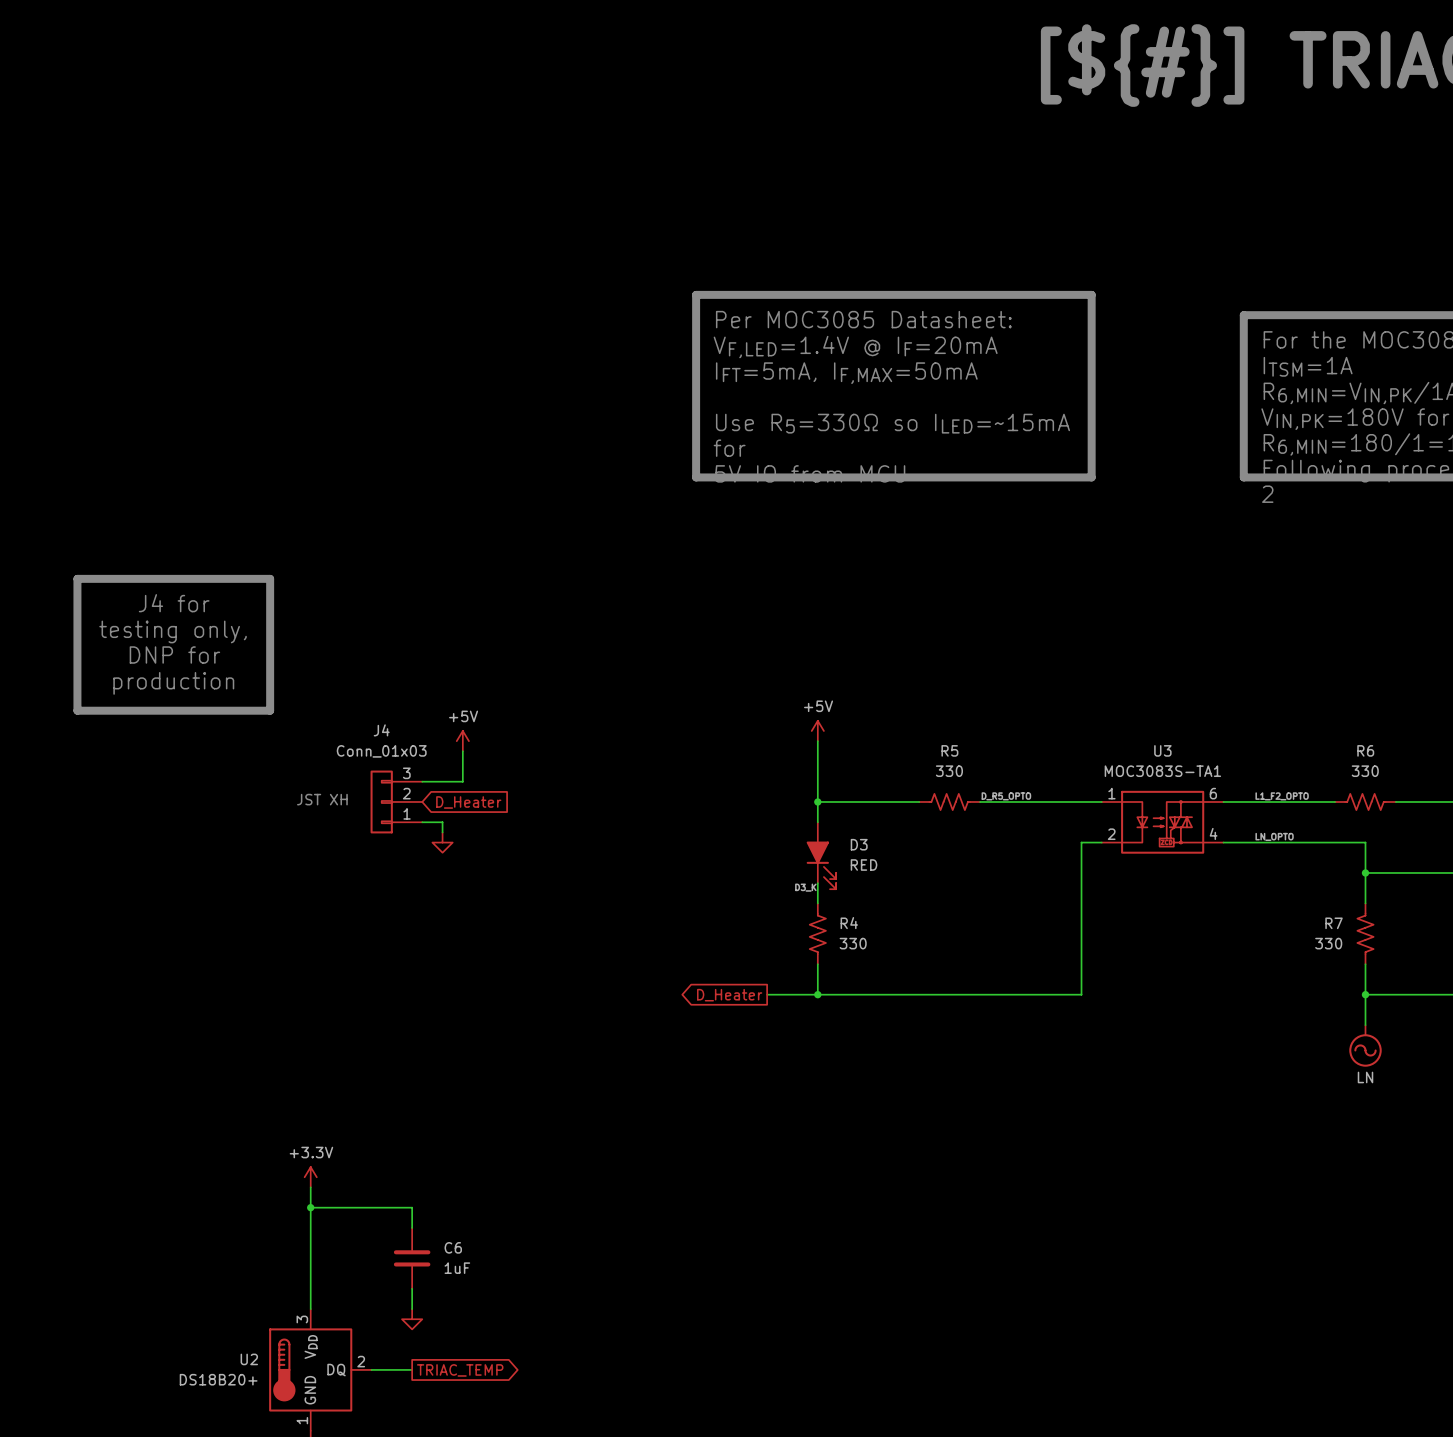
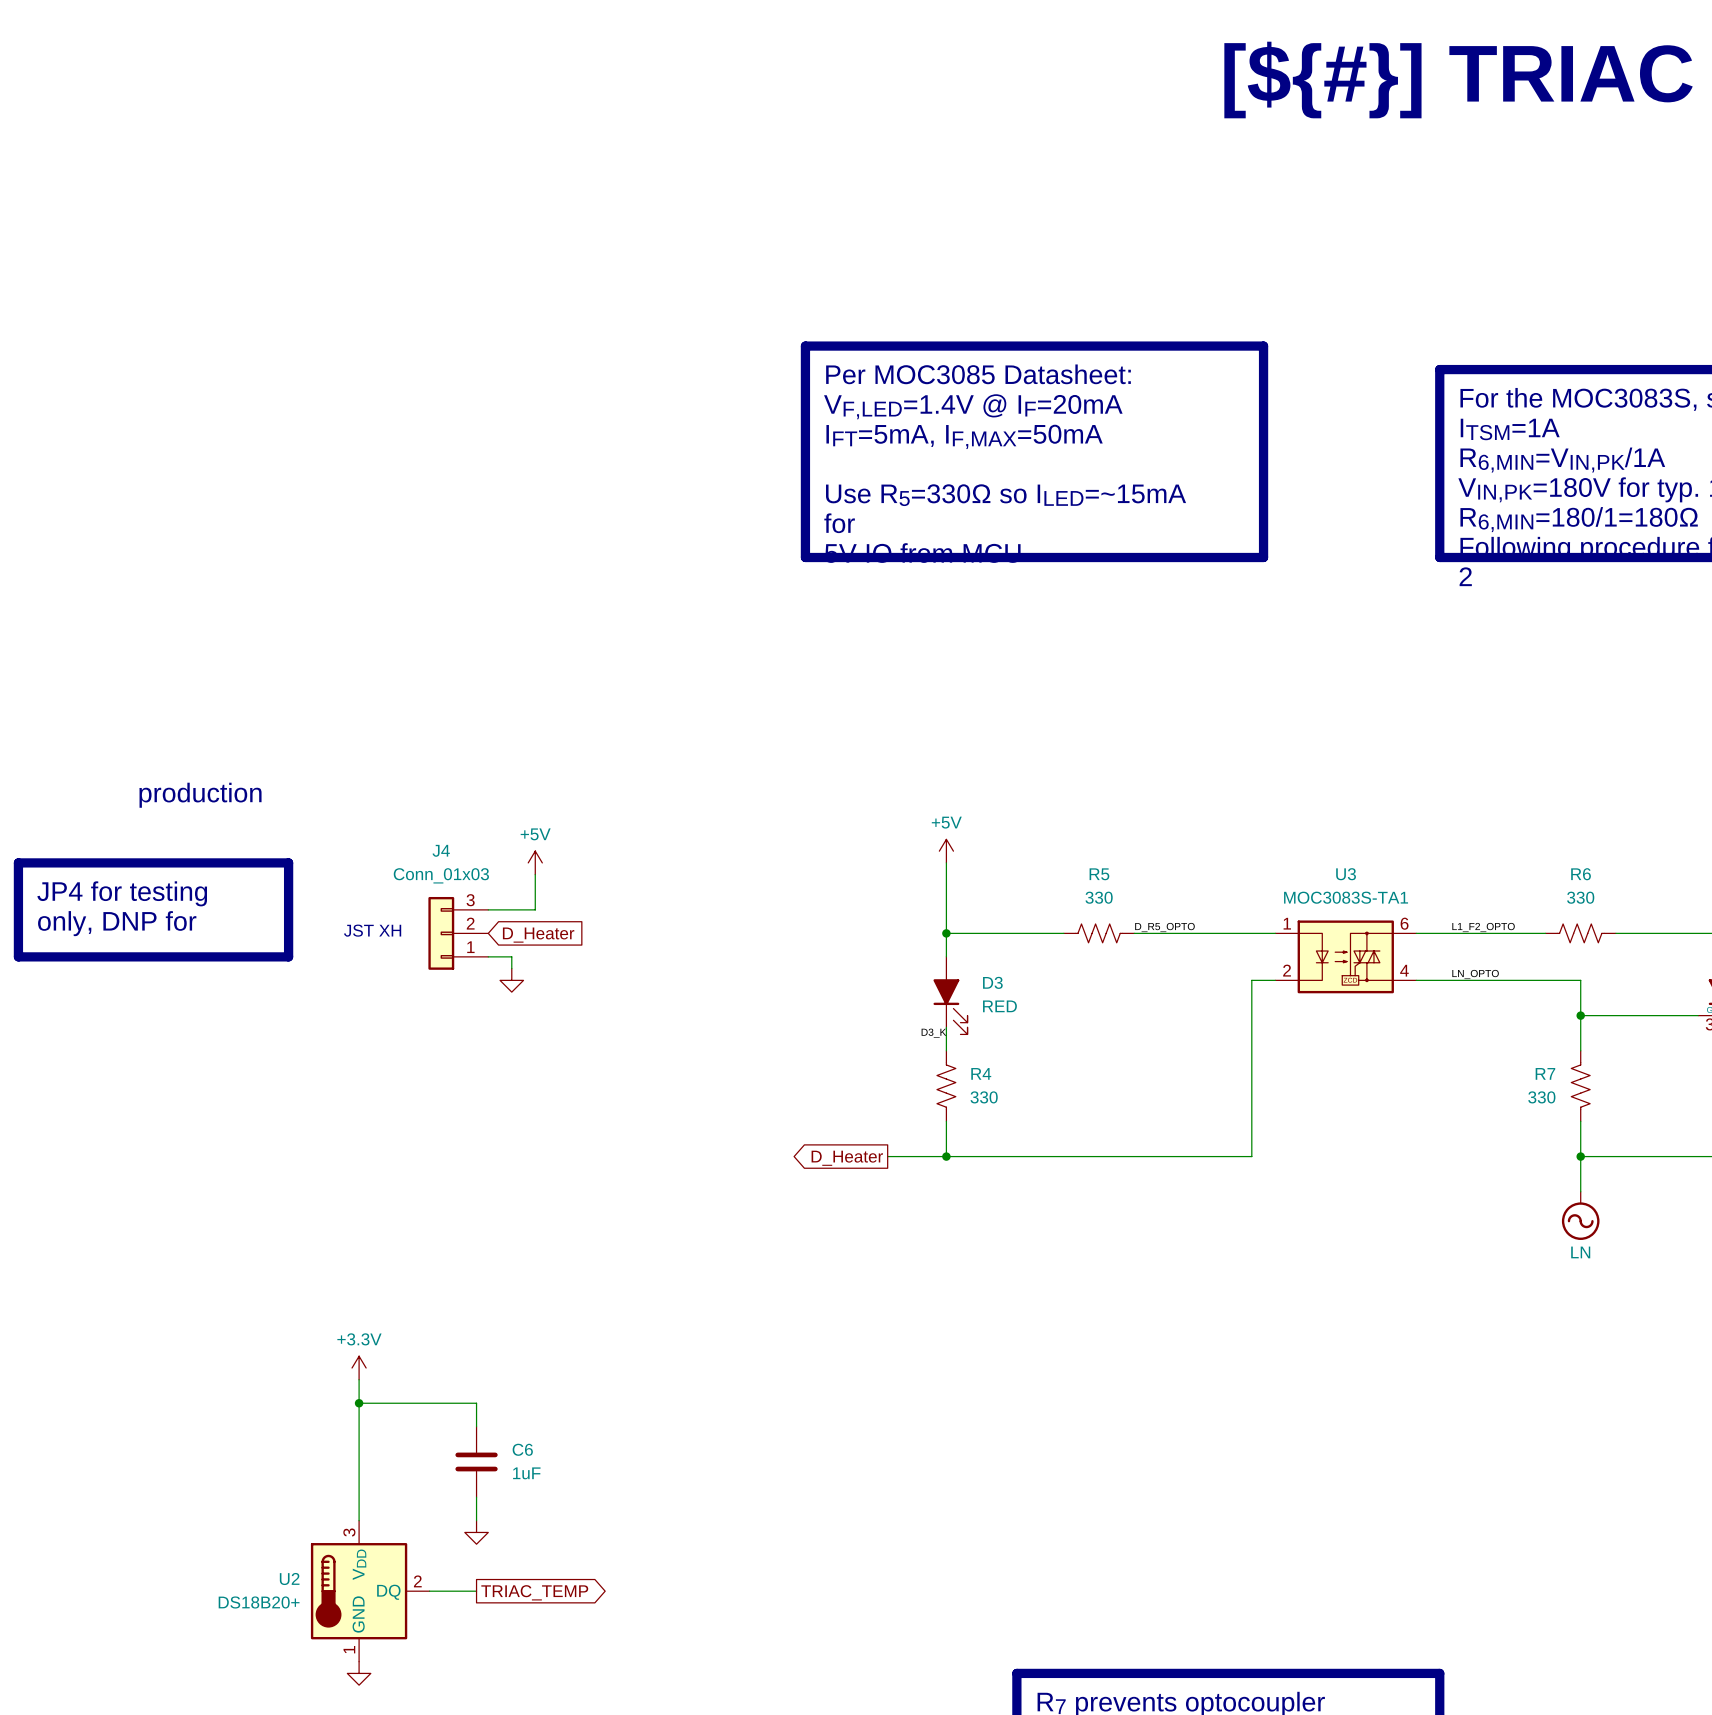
line: (77, 578) (270, 578) (270, 710) (77, 710) (77, 578) -> none
text: J4 for (174, 603) -> none
text: testing only, (173, 631) -> none
text: DNP for (174, 655) -> none
line: none -> (18, 862) (288, 862) (288, 956) (18, 956) (18, 862)
text: none -> JP4 for testing (122, 893)
text: none -> only, DNP for (117, 923)

